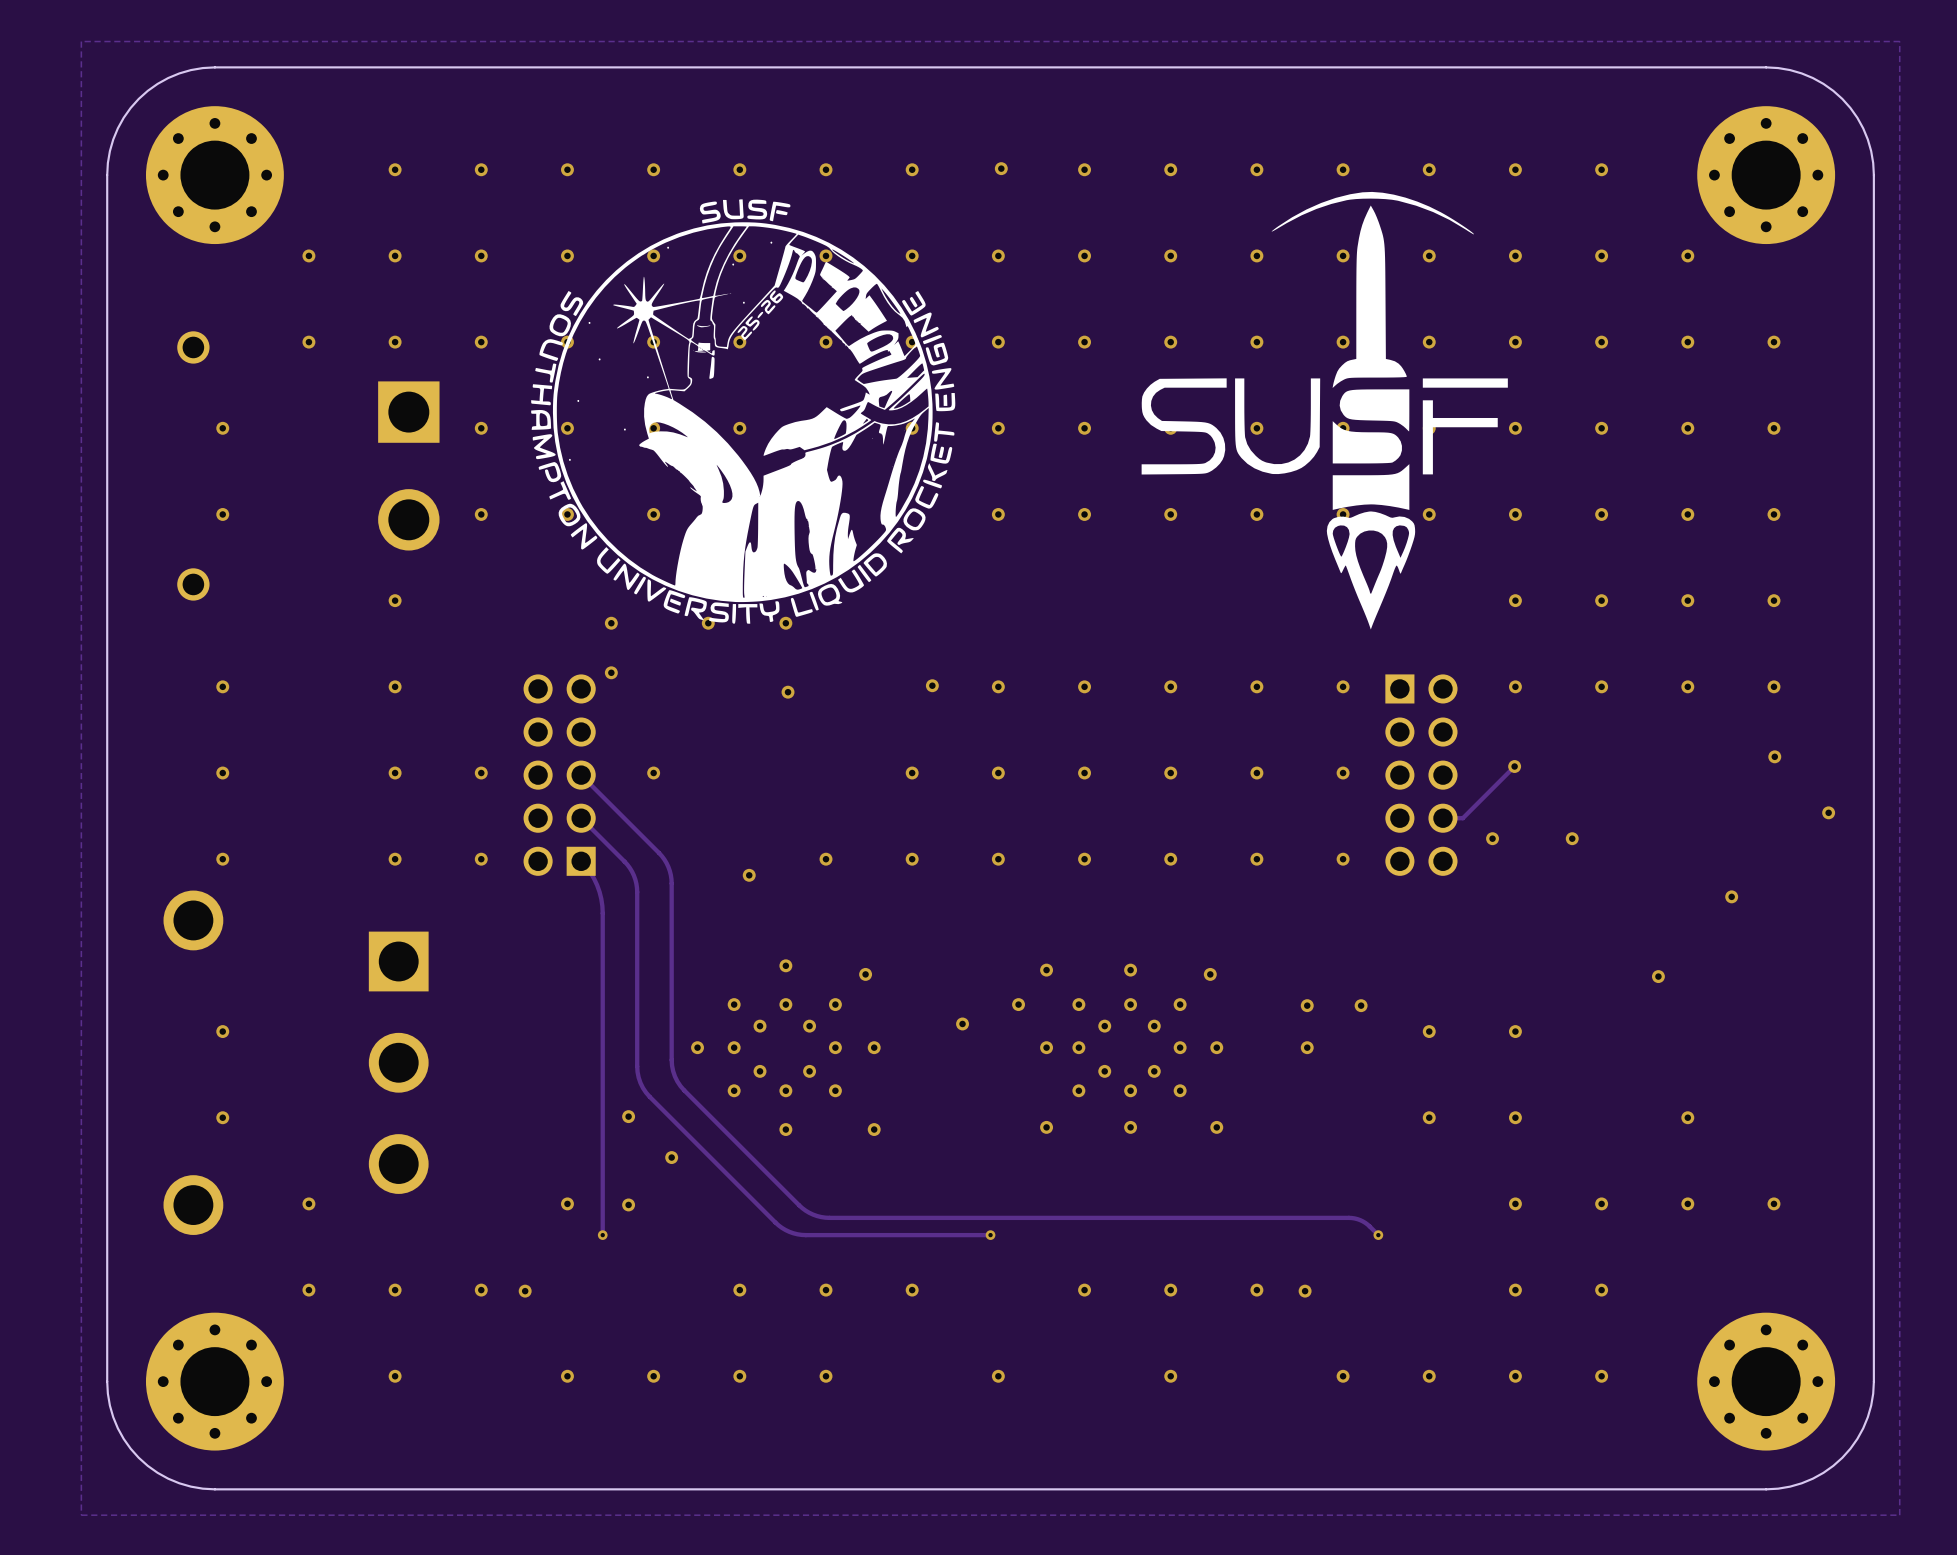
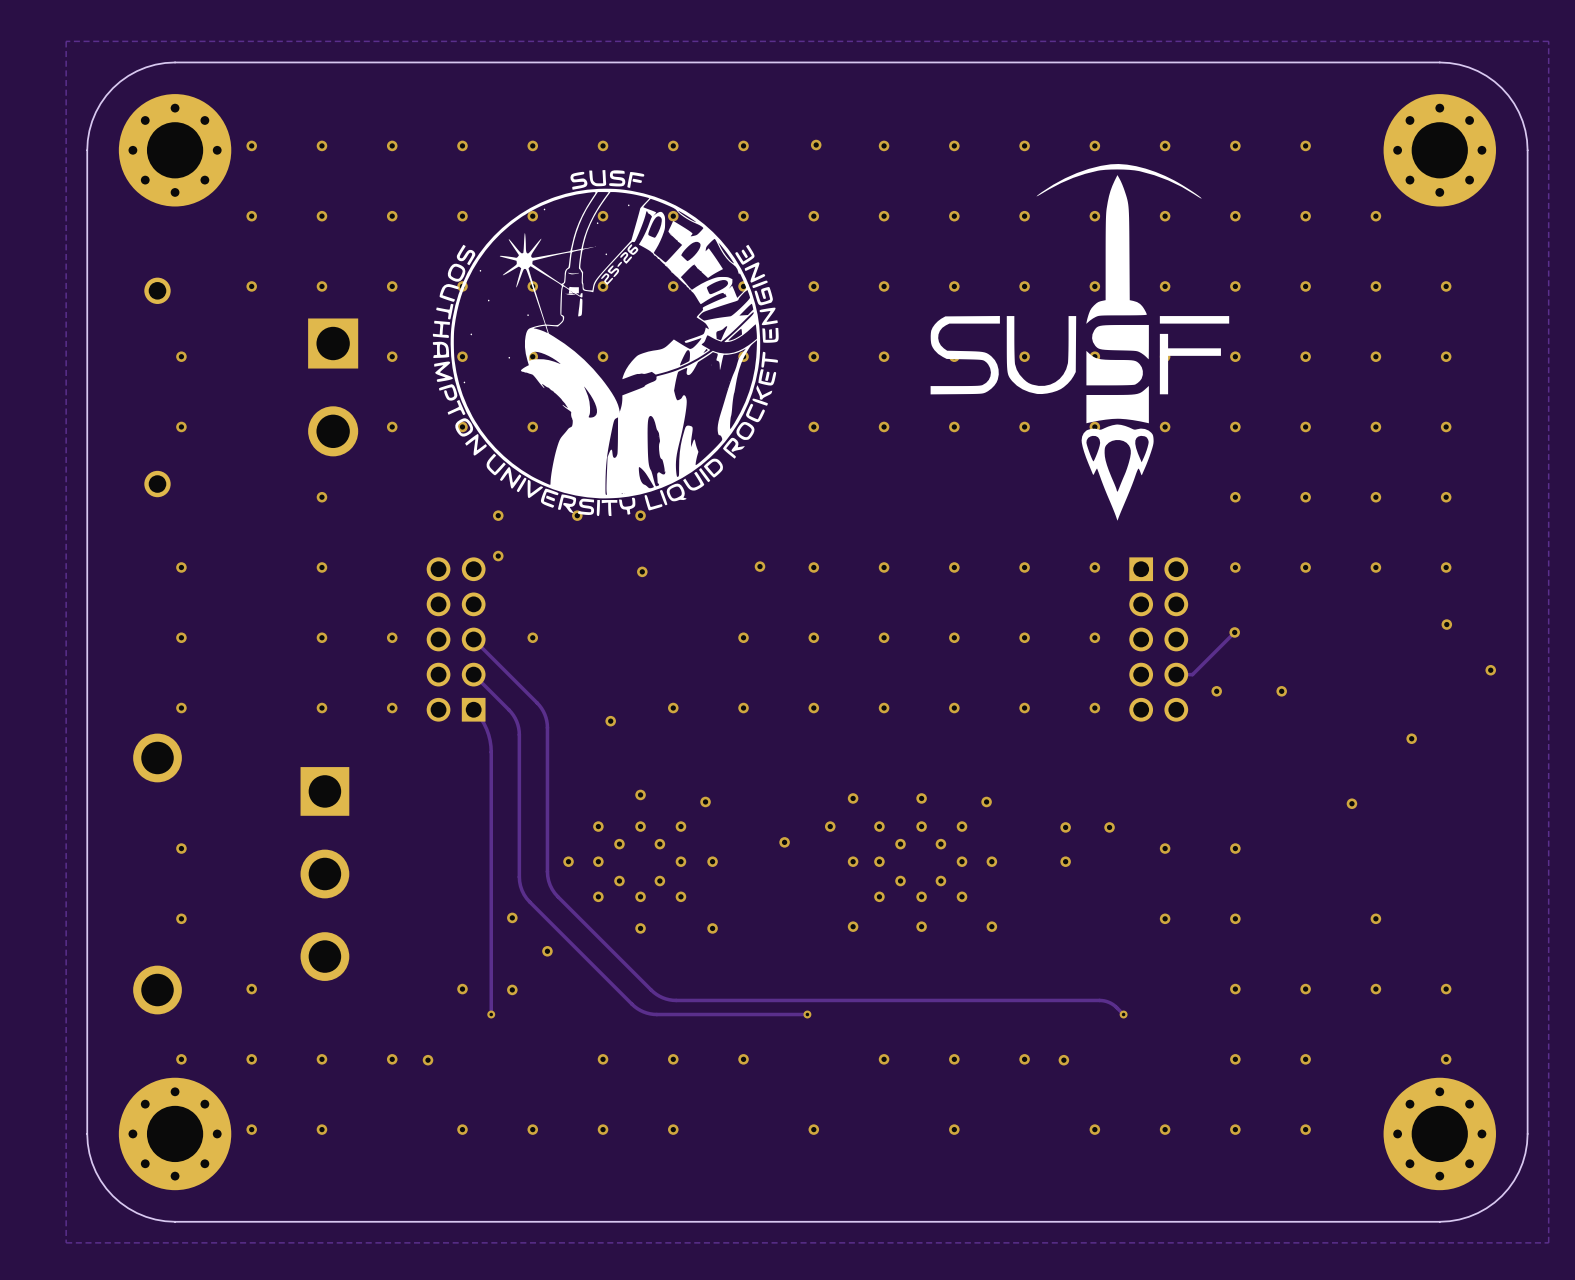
via: none -> (251, 145)
via: none -> (181, 1059)
via: none -> (1446, 1059)
via: none -> (251, 1129)

